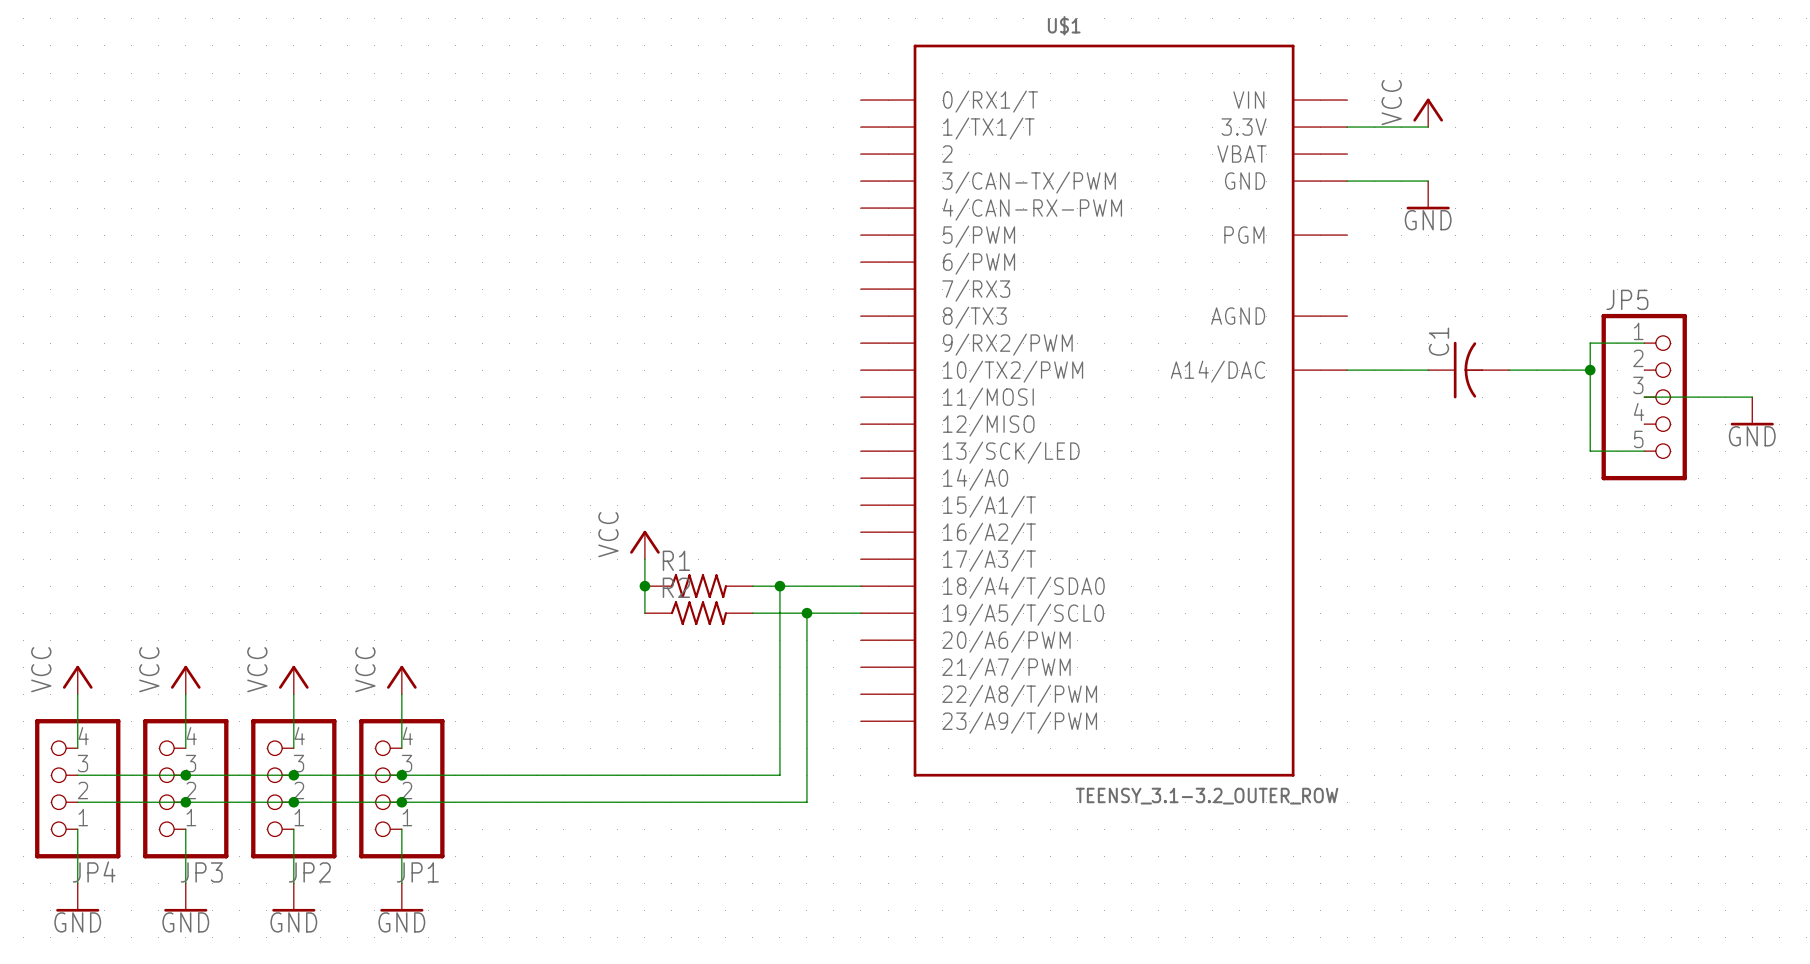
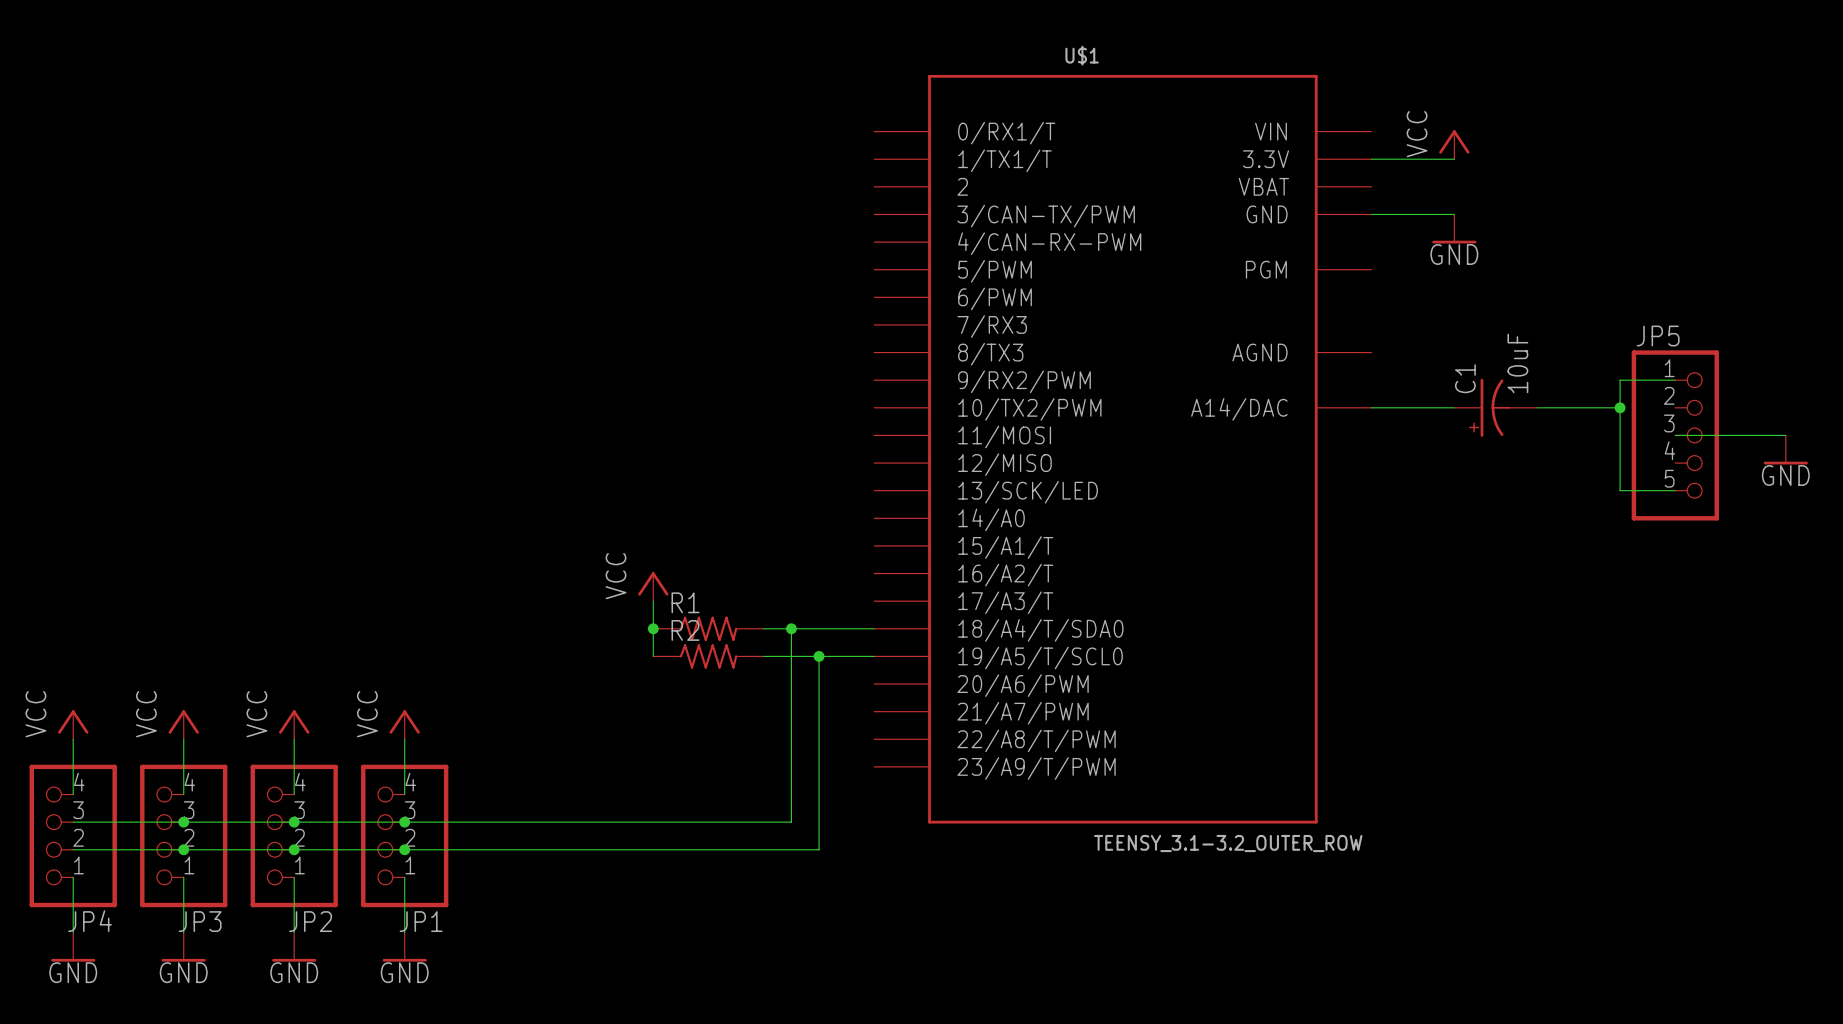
C1 value: none -> 10uF (1517, 363)
C1 symbol: [1428, 341, 1510, 399] -> [1454, 378, 1538, 437]

